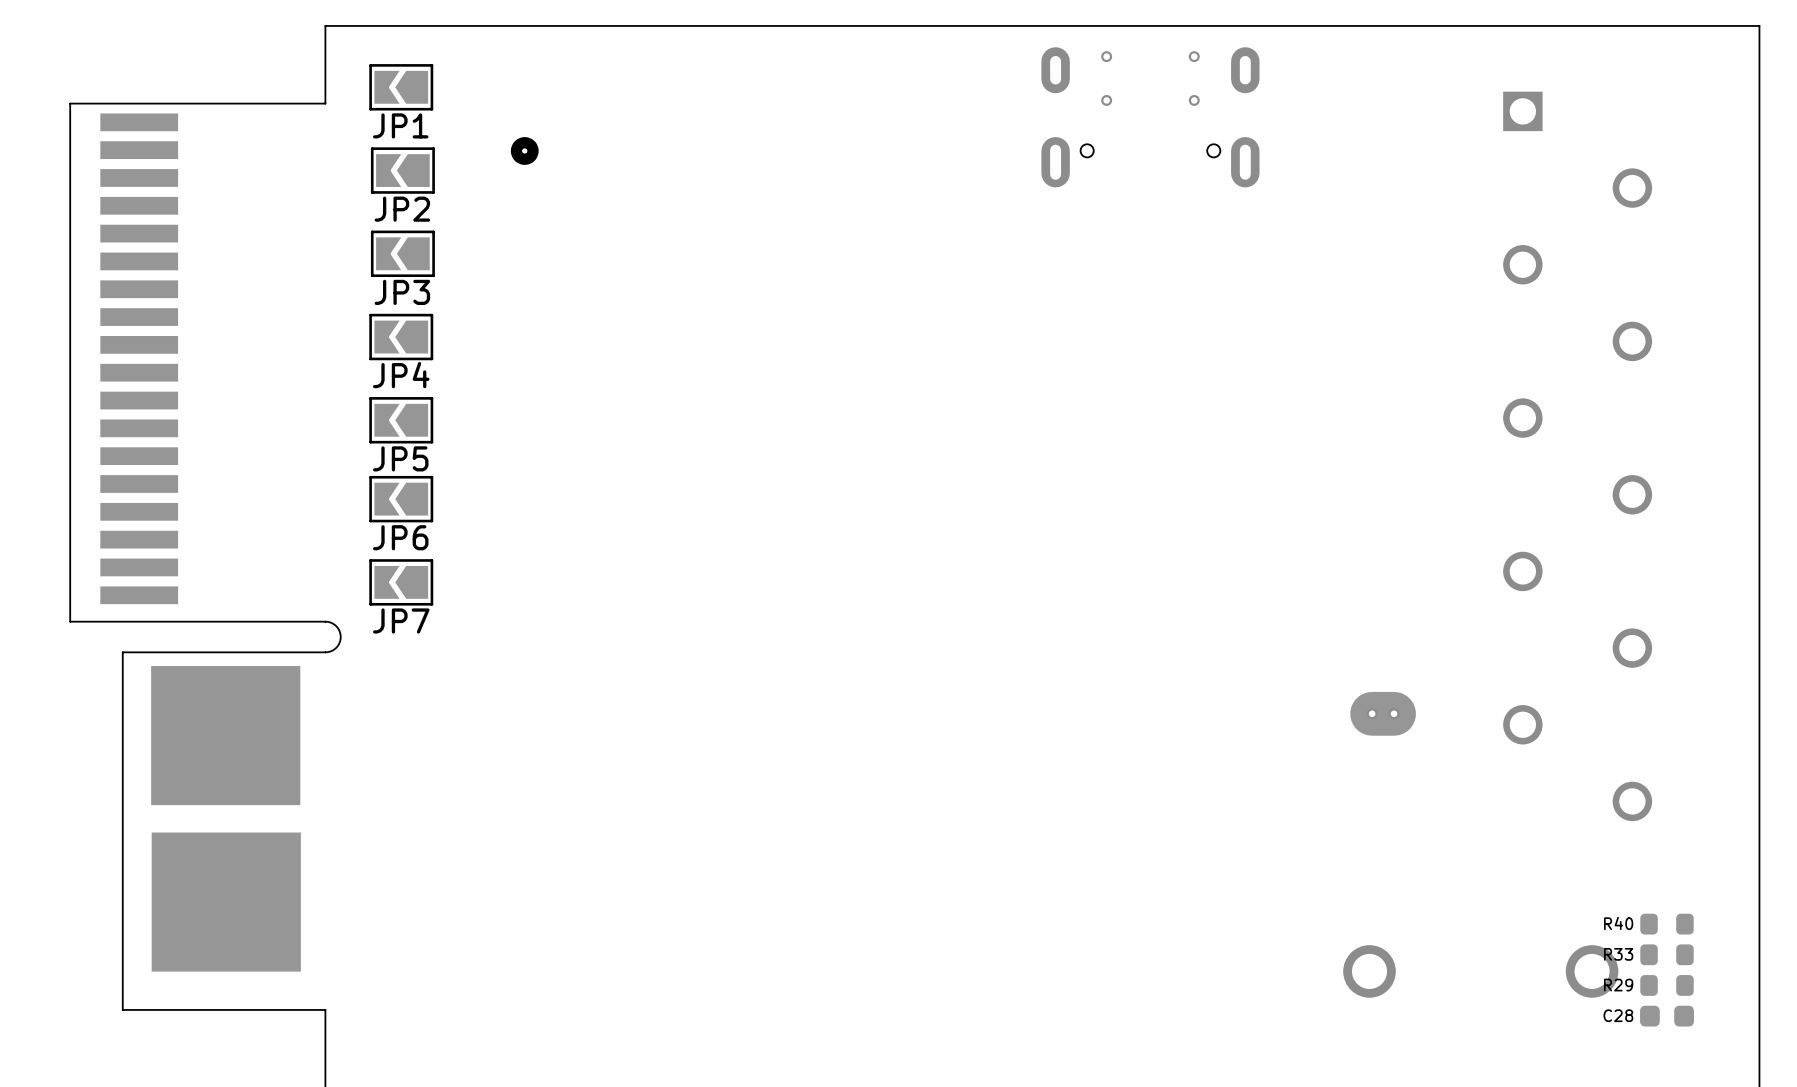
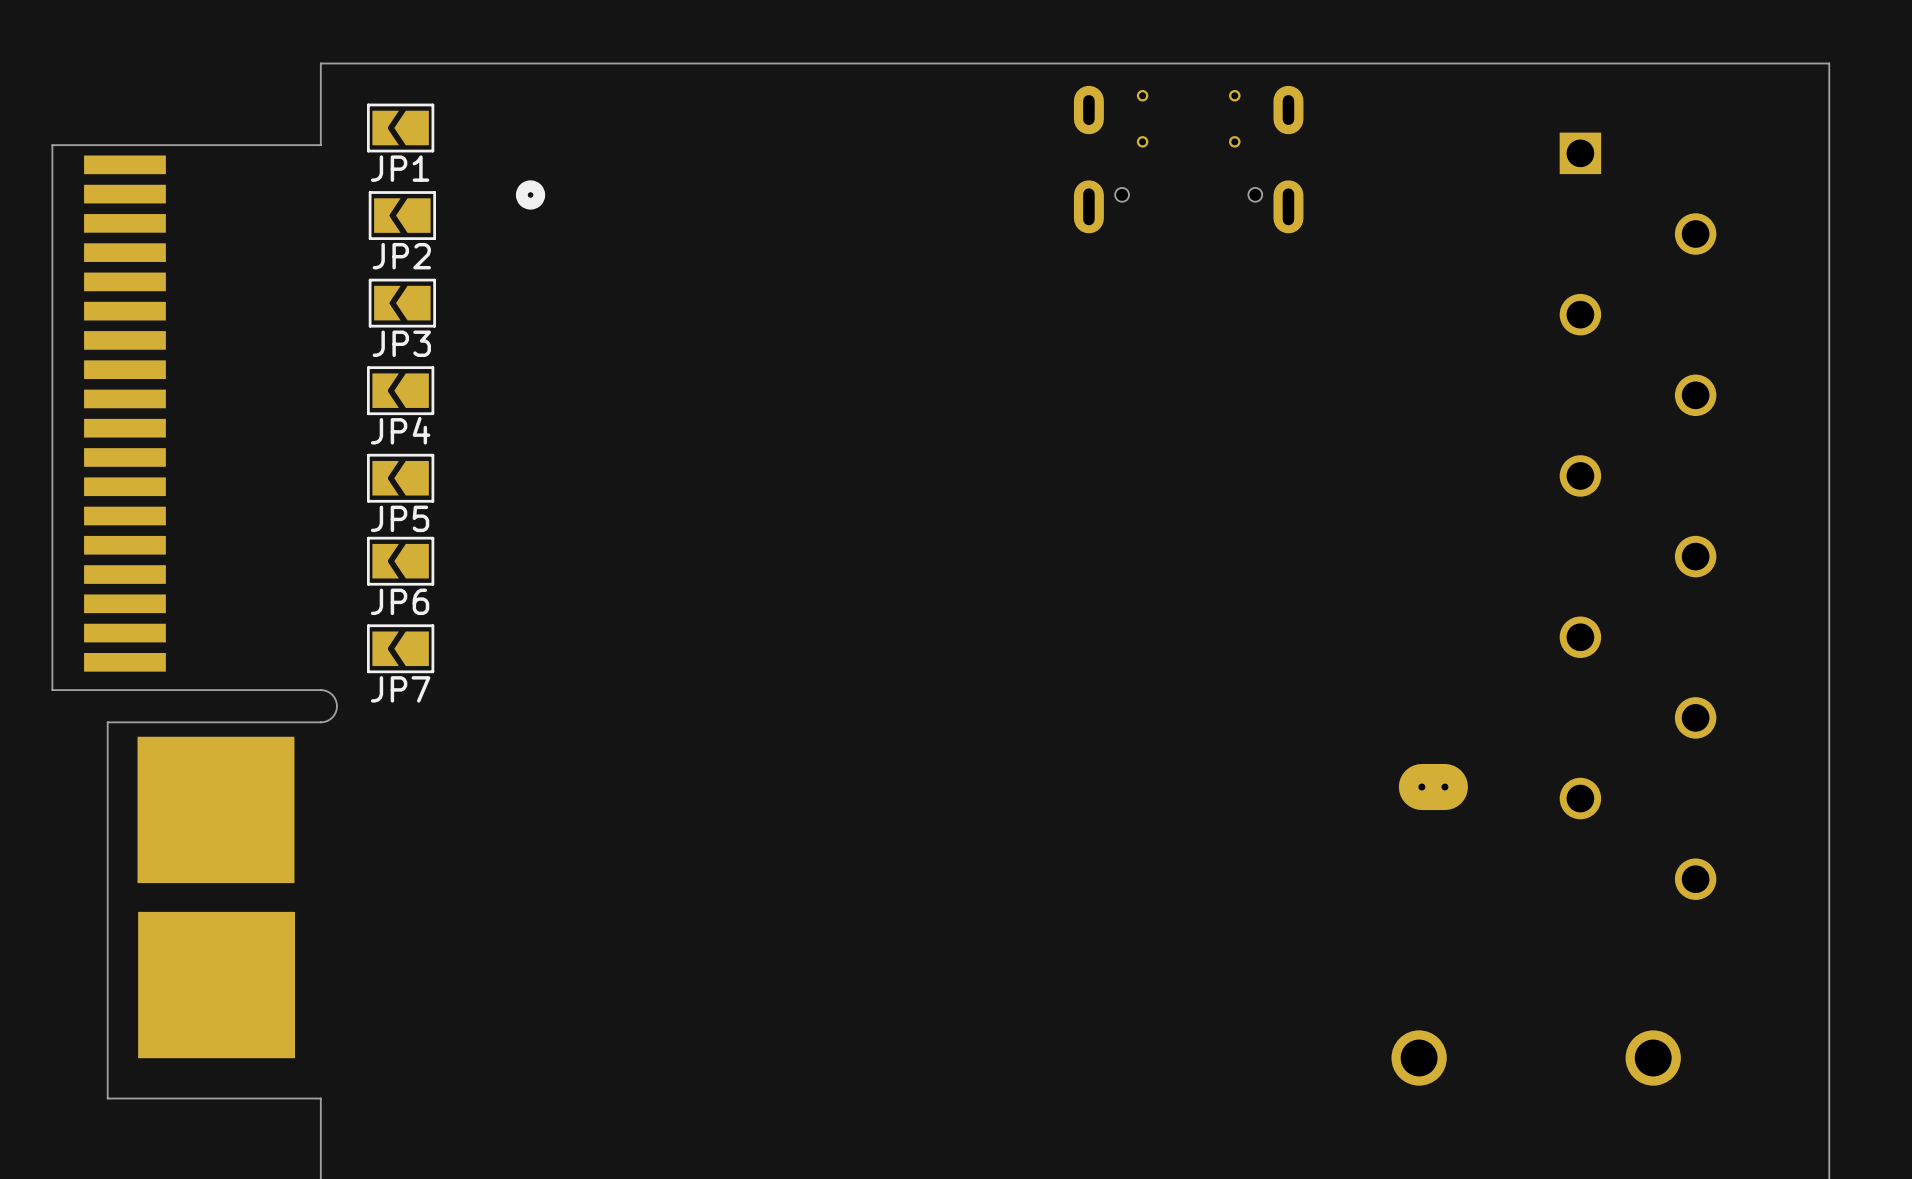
R40: (1667, 924) -> none
R33: (1667, 954) -> none
R29: (1667, 985) -> none
C28: (1667, 1016) -> none

